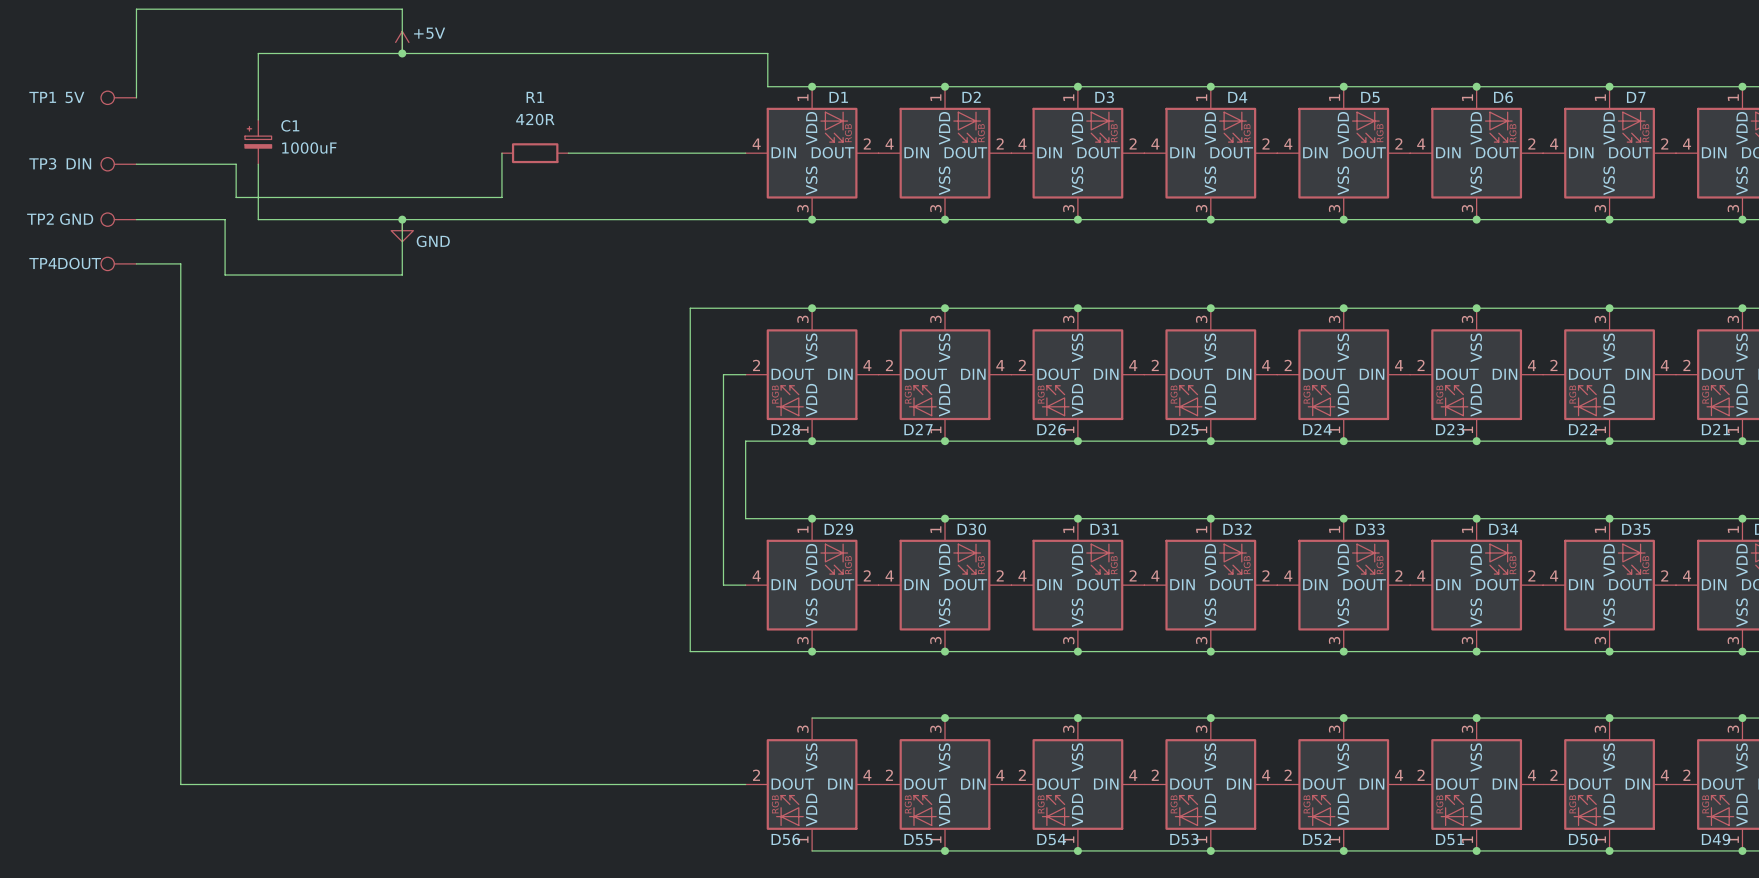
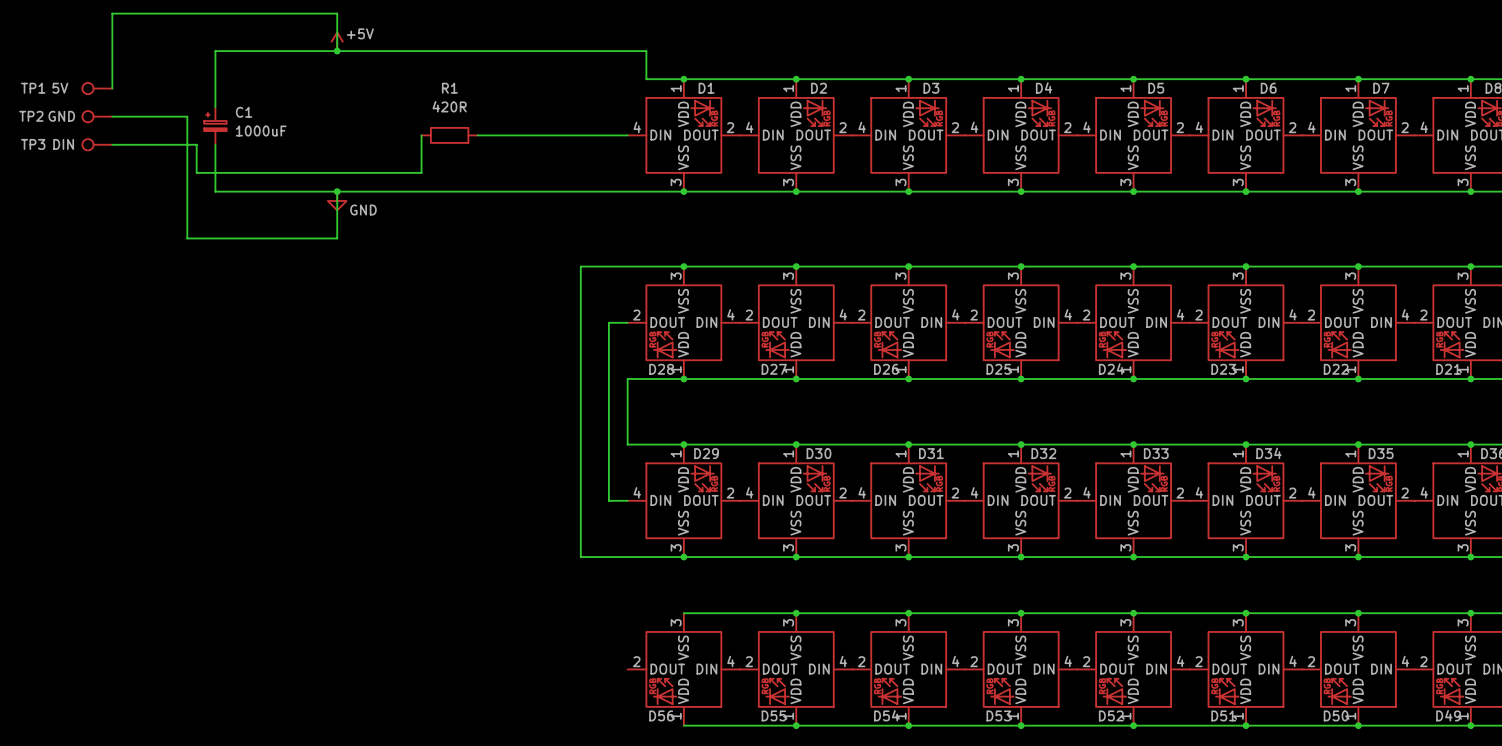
TP2 position: (118, 219) -> (97, 116)
wire: (136, 219) (225, 219) -> (112, 116) (187, 116) (187, 191)
TP4: DOUT (118, 263) -> none
wire: (136, 263) (180, 263) (180, 784) (745, 784) -> none

